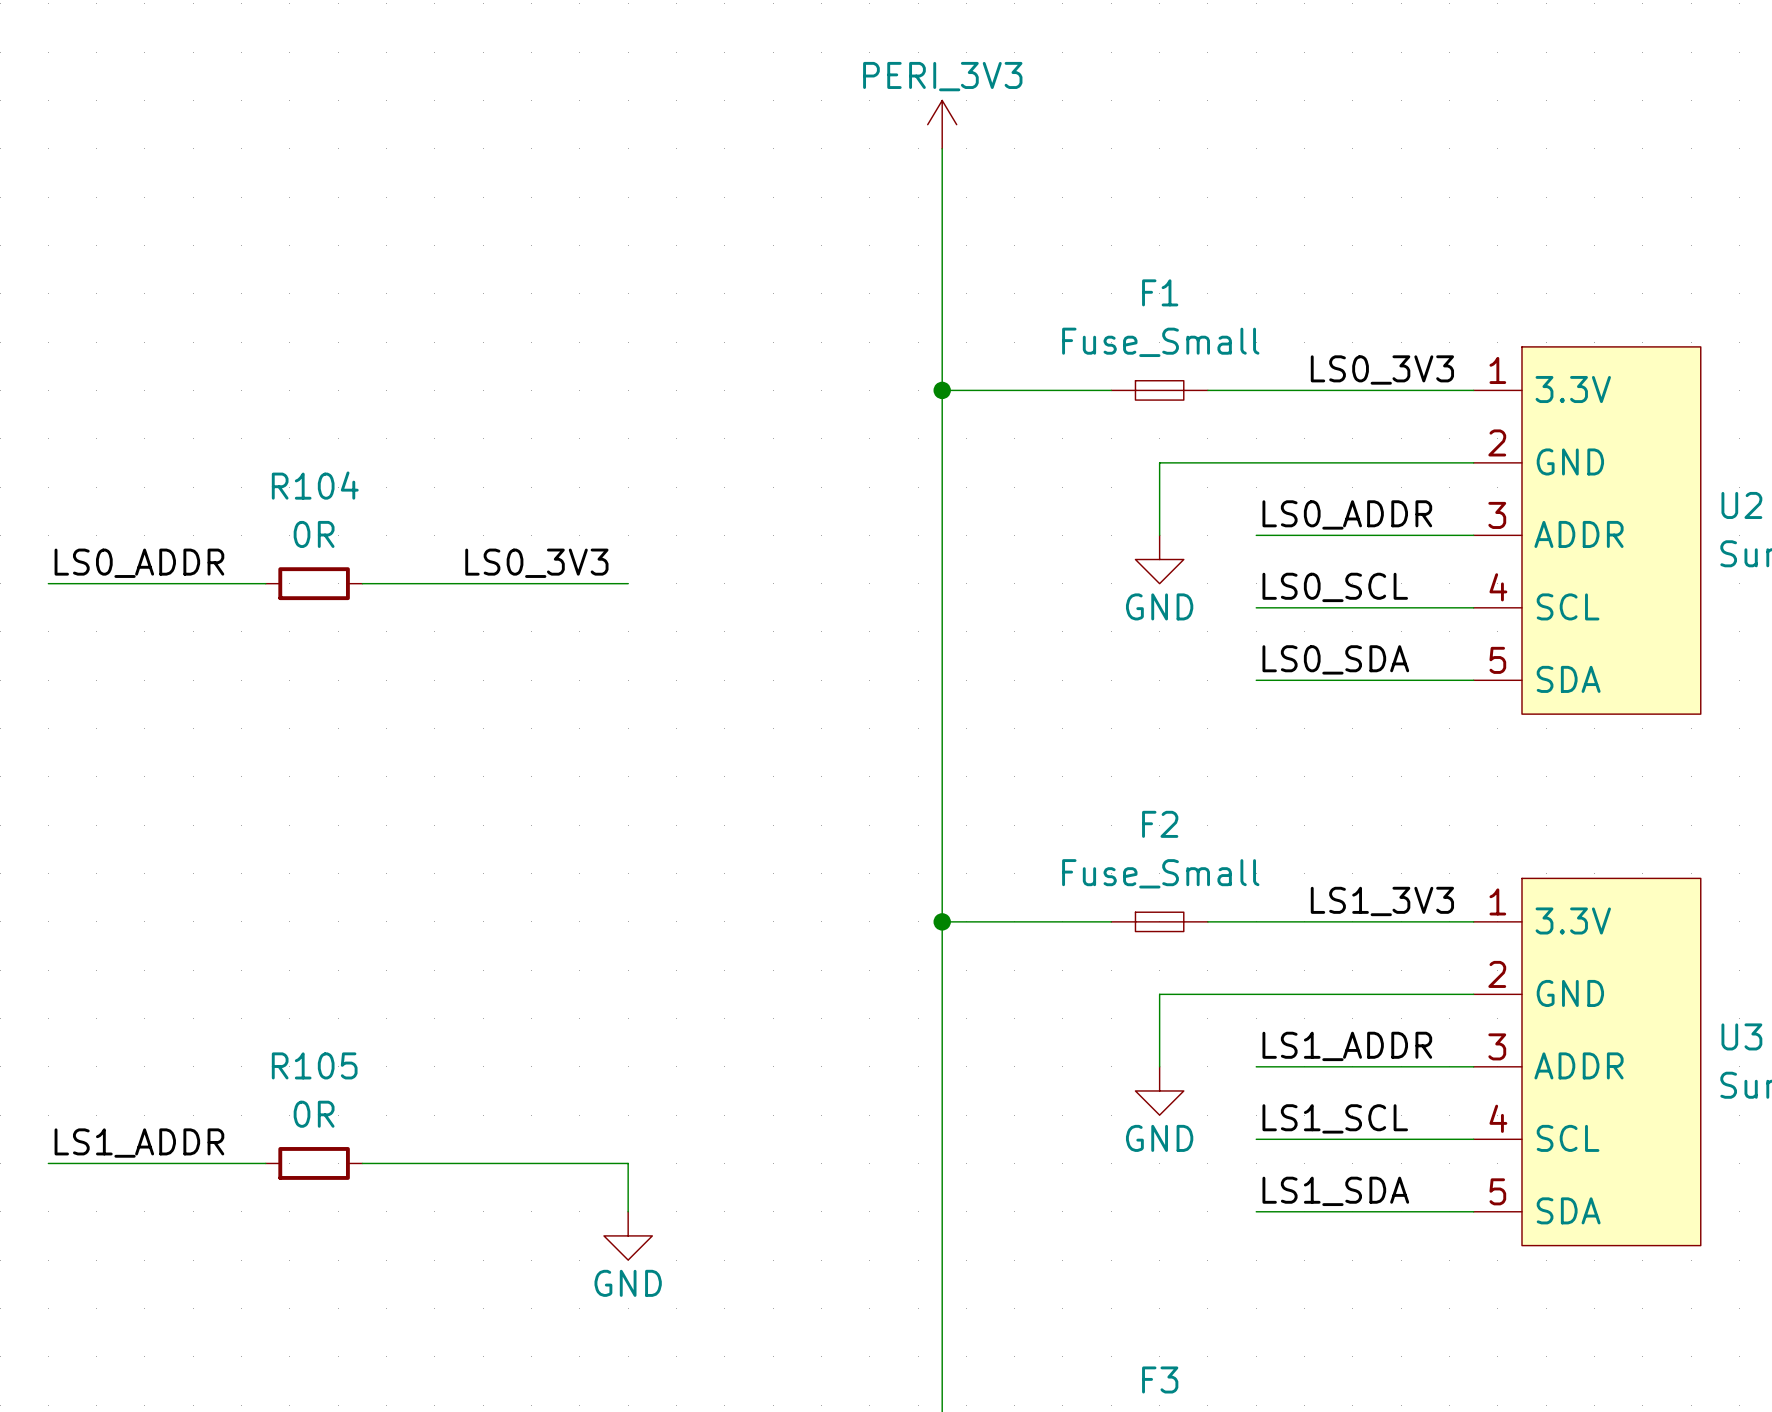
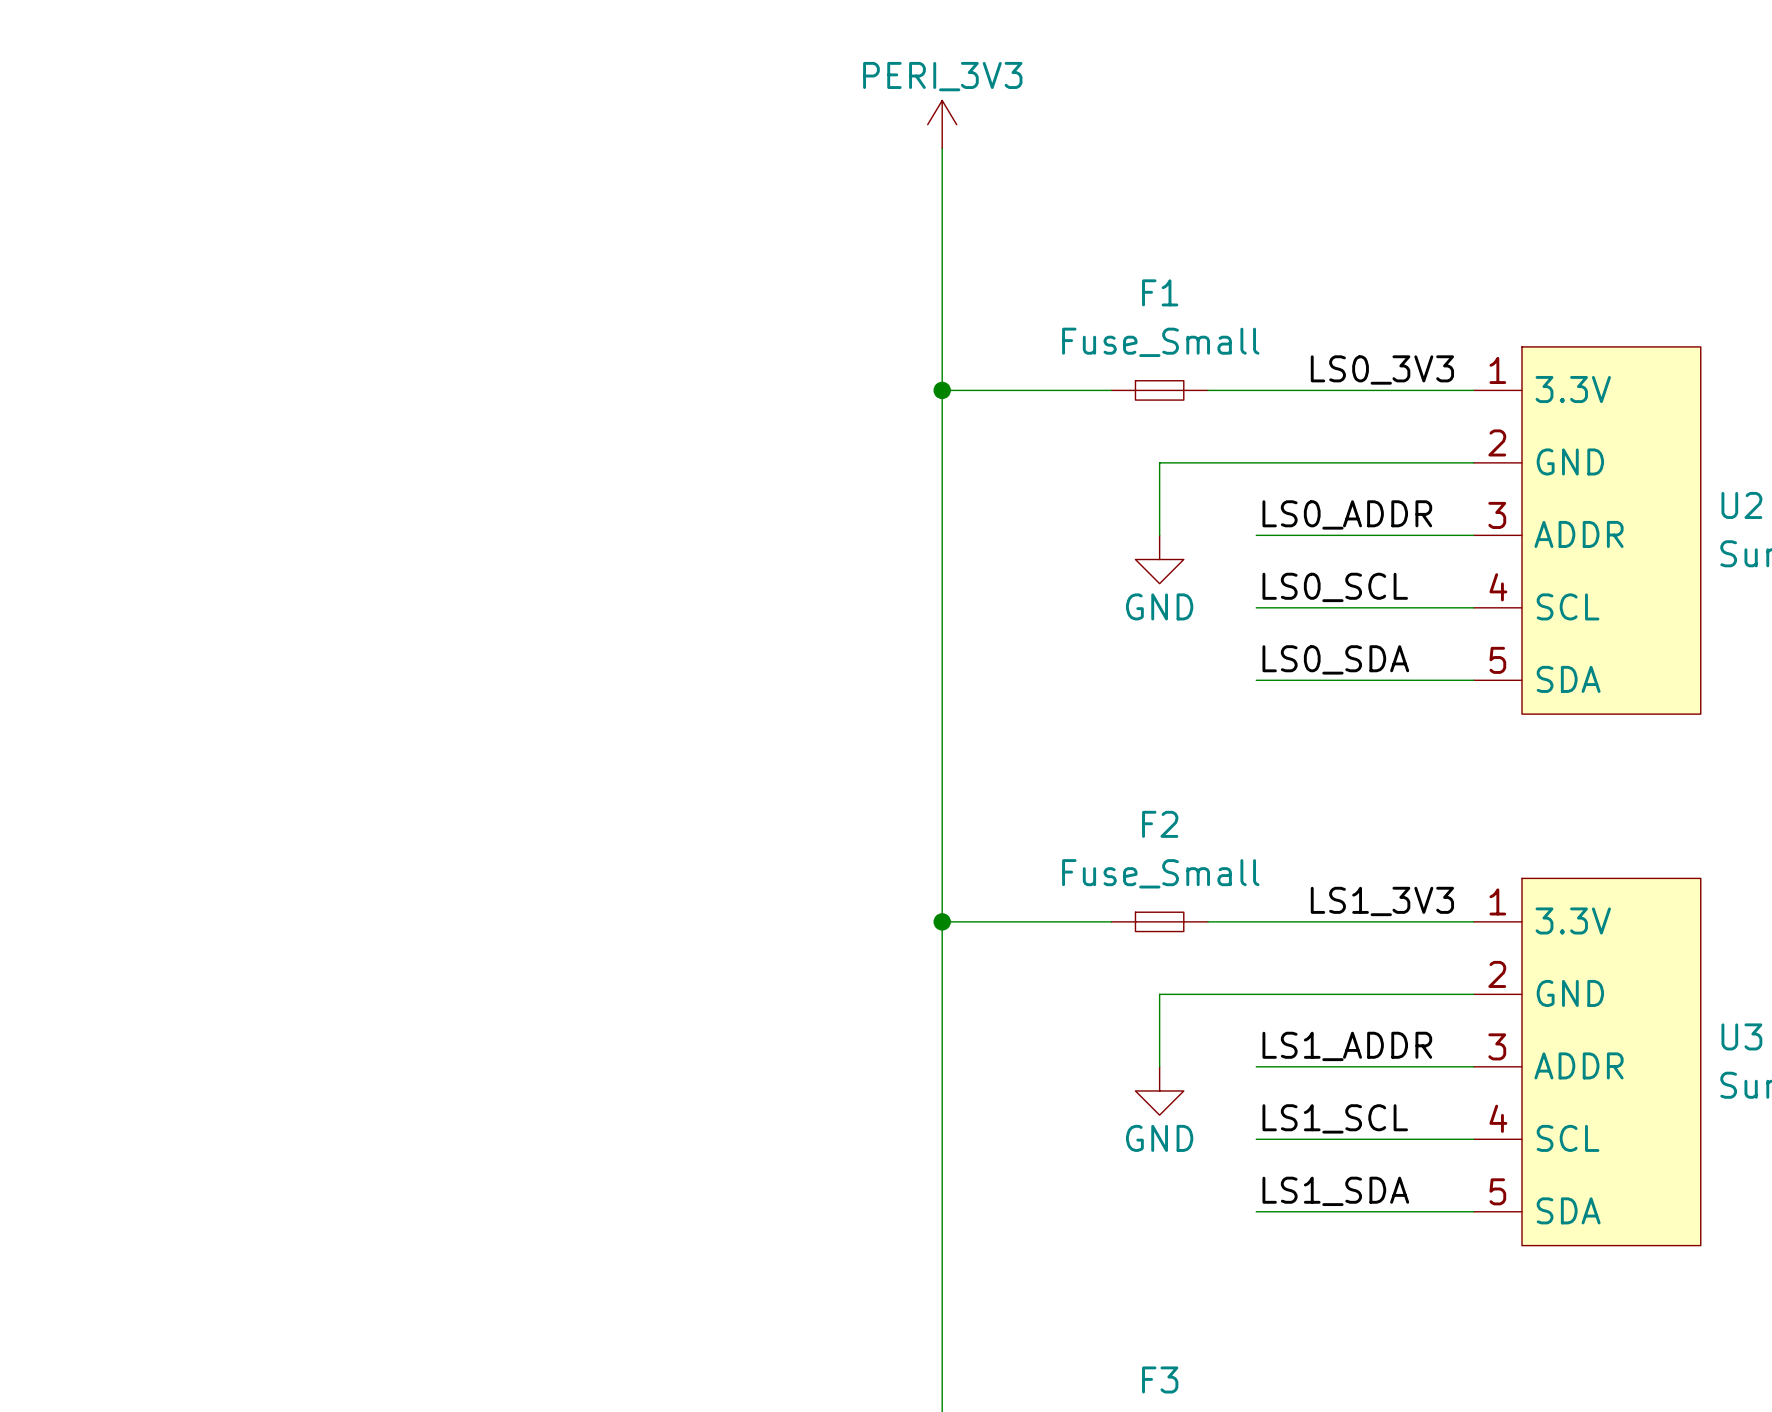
label: LS0_ADDR (139, 563) -> none
label: LS0_3V3 (536, 563) -> none
wire: (48, 583) (265, 583) -> none
R104: 0R (314, 583) -> none
wire: (362, 583) (628, 583) -> none
label: LS1_ADDR (139, 1143) -> none
wire: (48, 1163) (265, 1163) -> none
R105: 0R (314, 1163) -> none
wire: (362, 1163) (628, 1163) (628, 1211) -> none
power symbol: GND (628, 1235) -> none

